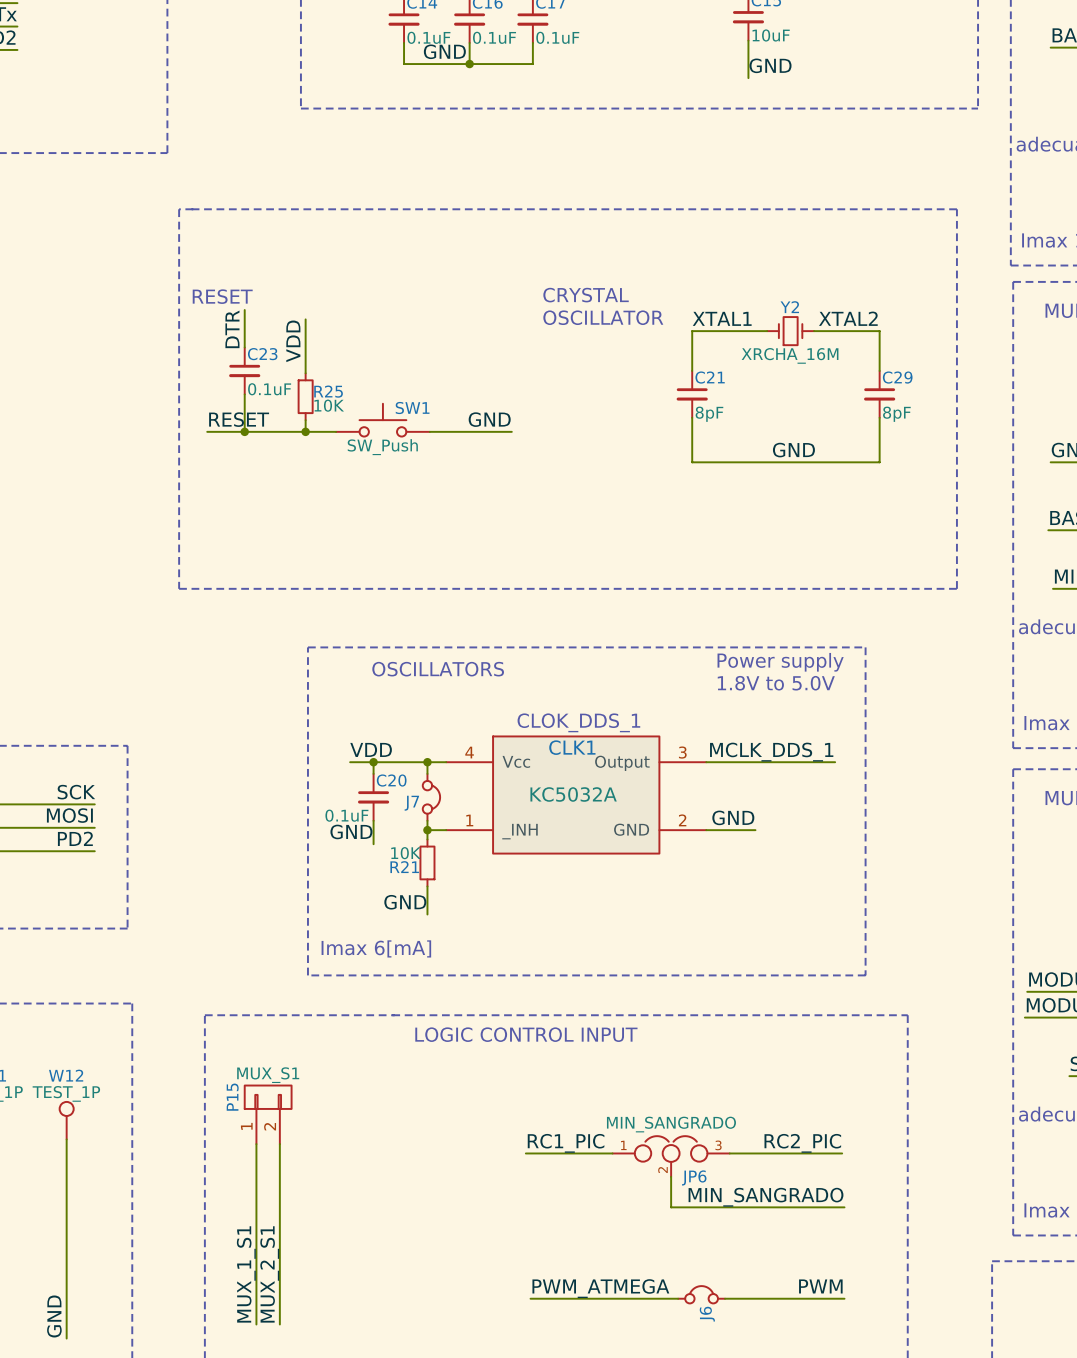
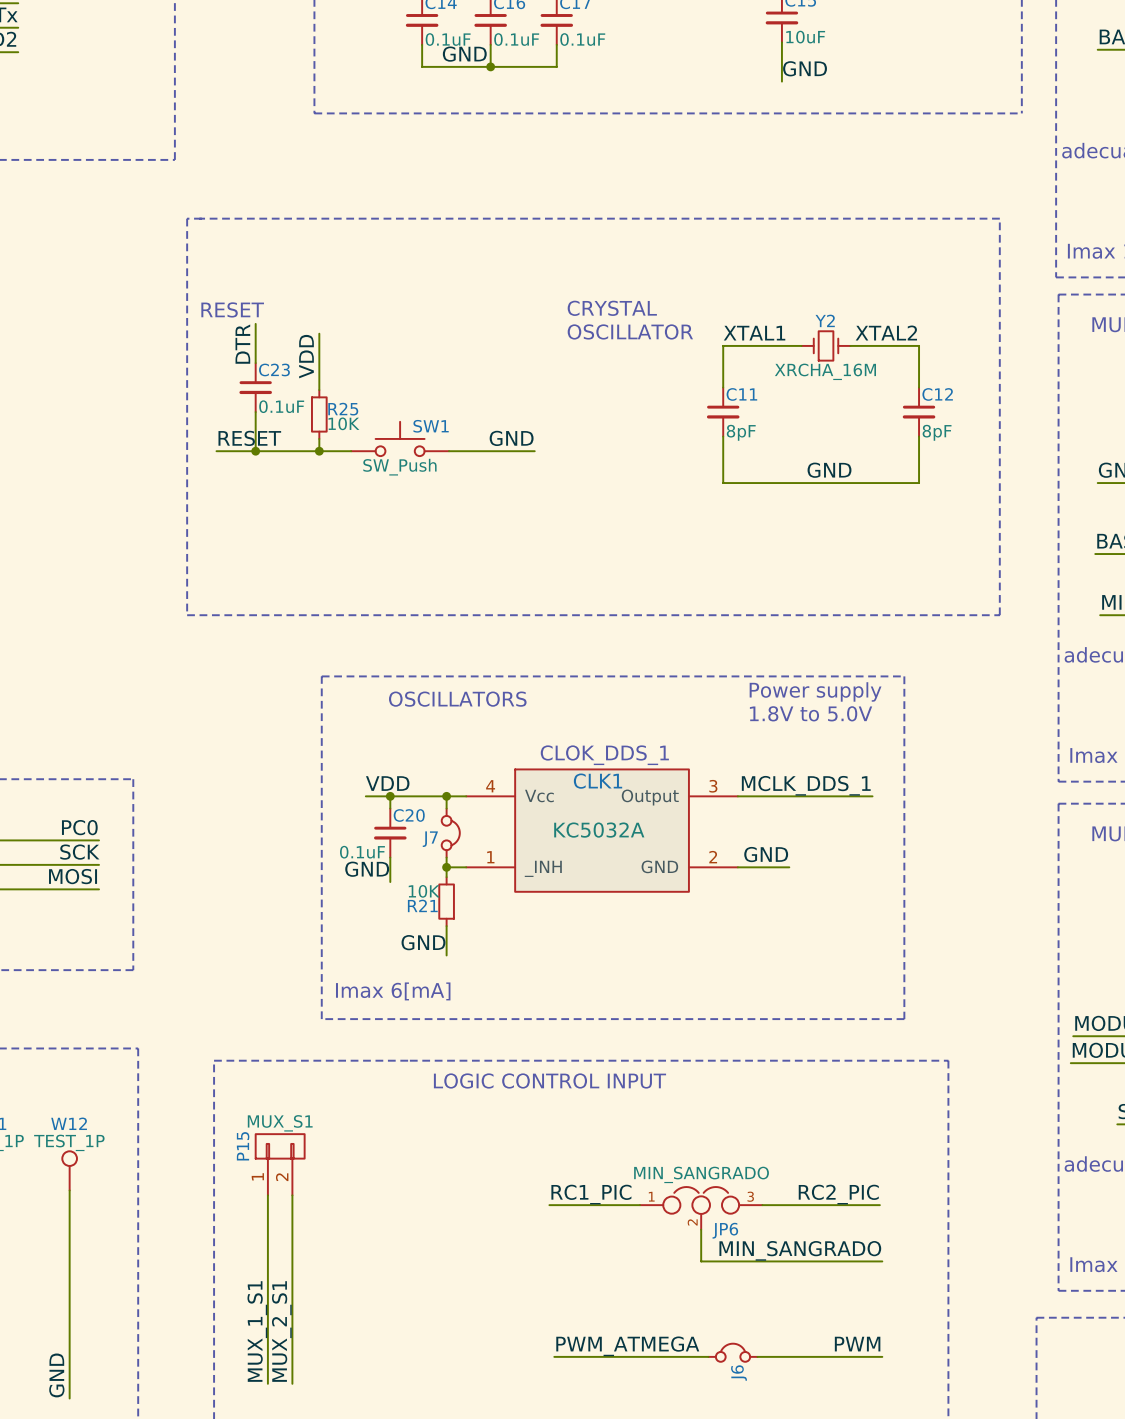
C21 name: C21 (710, 377) -> C11 (741, 394)
C29 name: C29 (897, 377) -> C12 (937, 394)
label: SCK (76, 792) -> PC0 (79, 827)
label: MOSI (69, 815) -> SCK (79, 852)
label: PD2 (75, 838) -> MOSI (73, 876)

